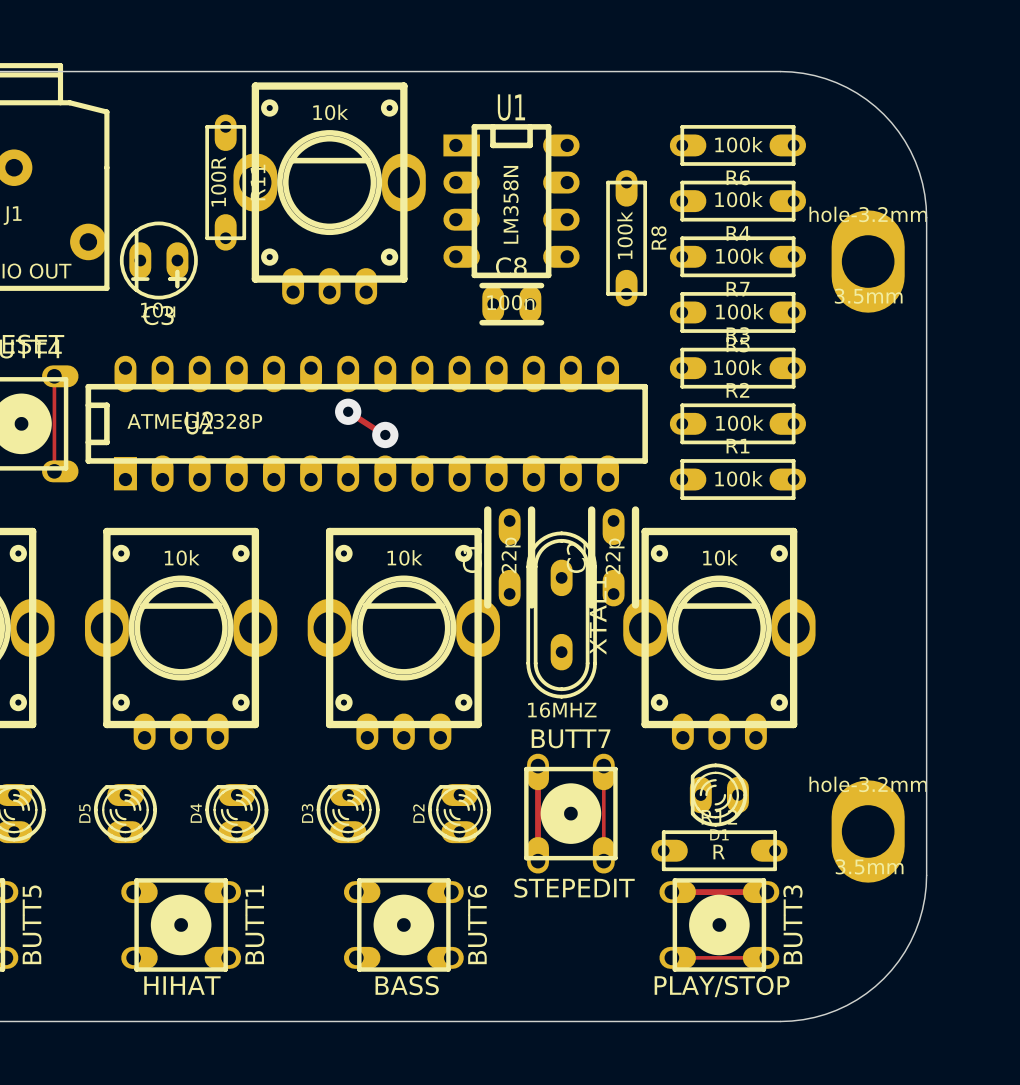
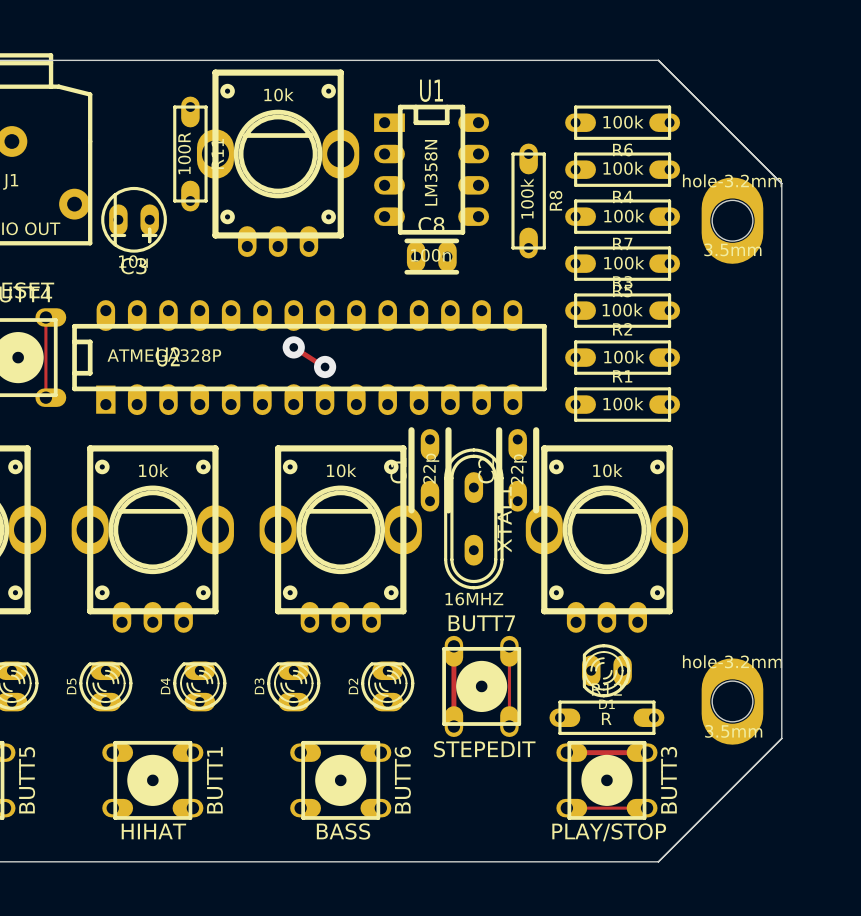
board edge: (780, 71) (803, 73) (836, 82) (866, 99) (883, 114) (898, 131) (915, 161) (924, 194) (926, 217) -> (658, 60) (781, 183)
round board edge: none -> [711, 199, 754, 242]
round board edge: none -> [711, 680, 754, 723]
board edge: (926, 875) (924, 898) (915, 931) (898, 961) (883, 978) (866, 993) (836, 1010) (803, 1019) (780, 1021) -> (781, 738) (658, 861)

